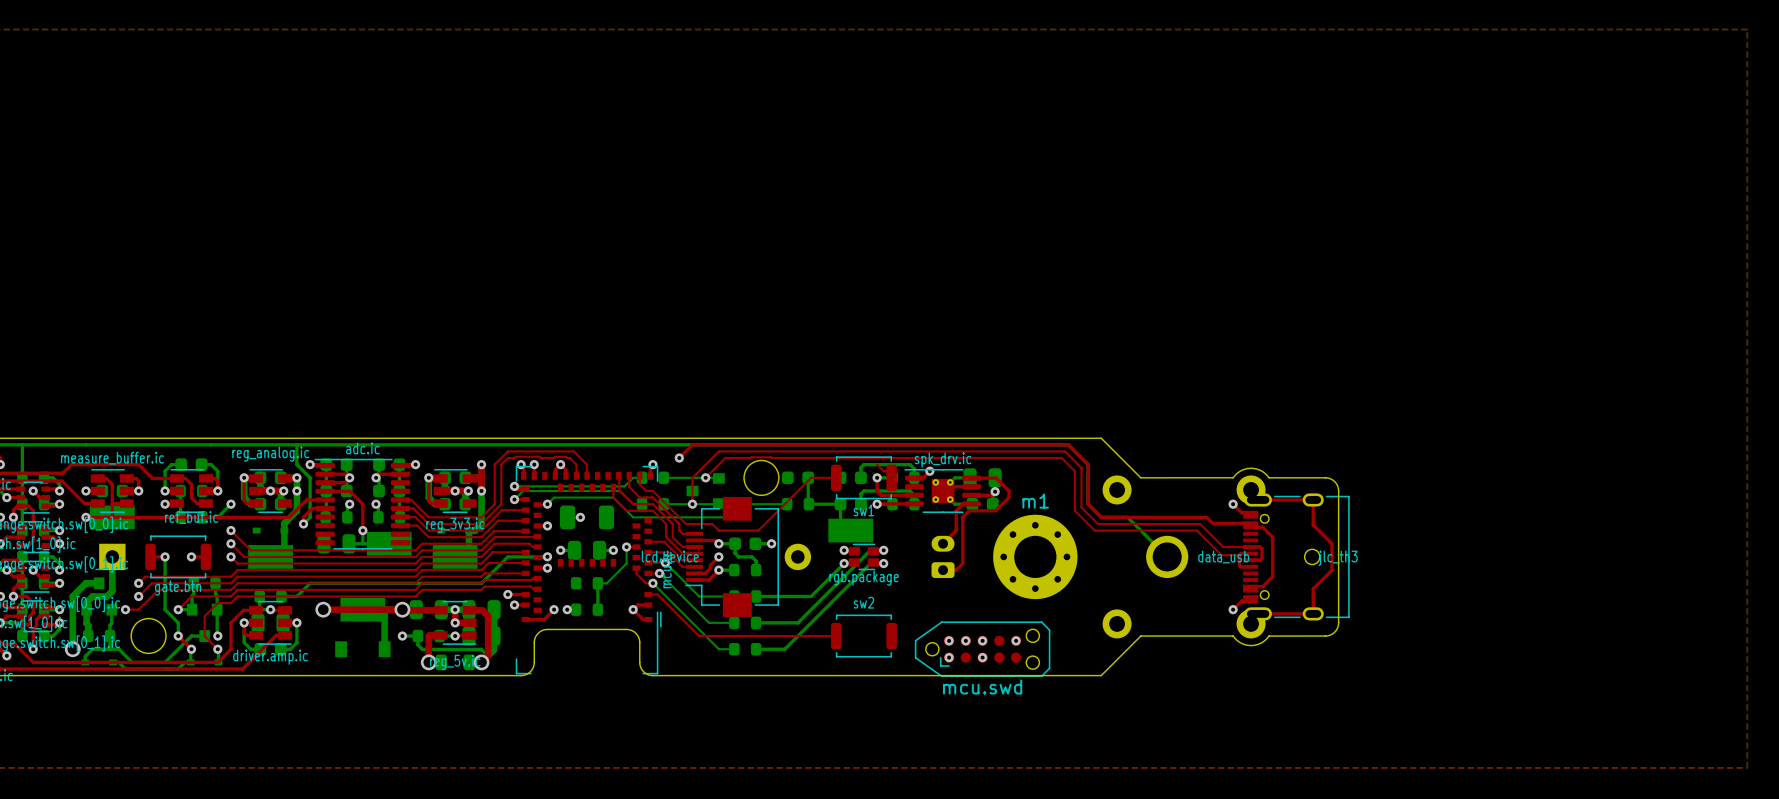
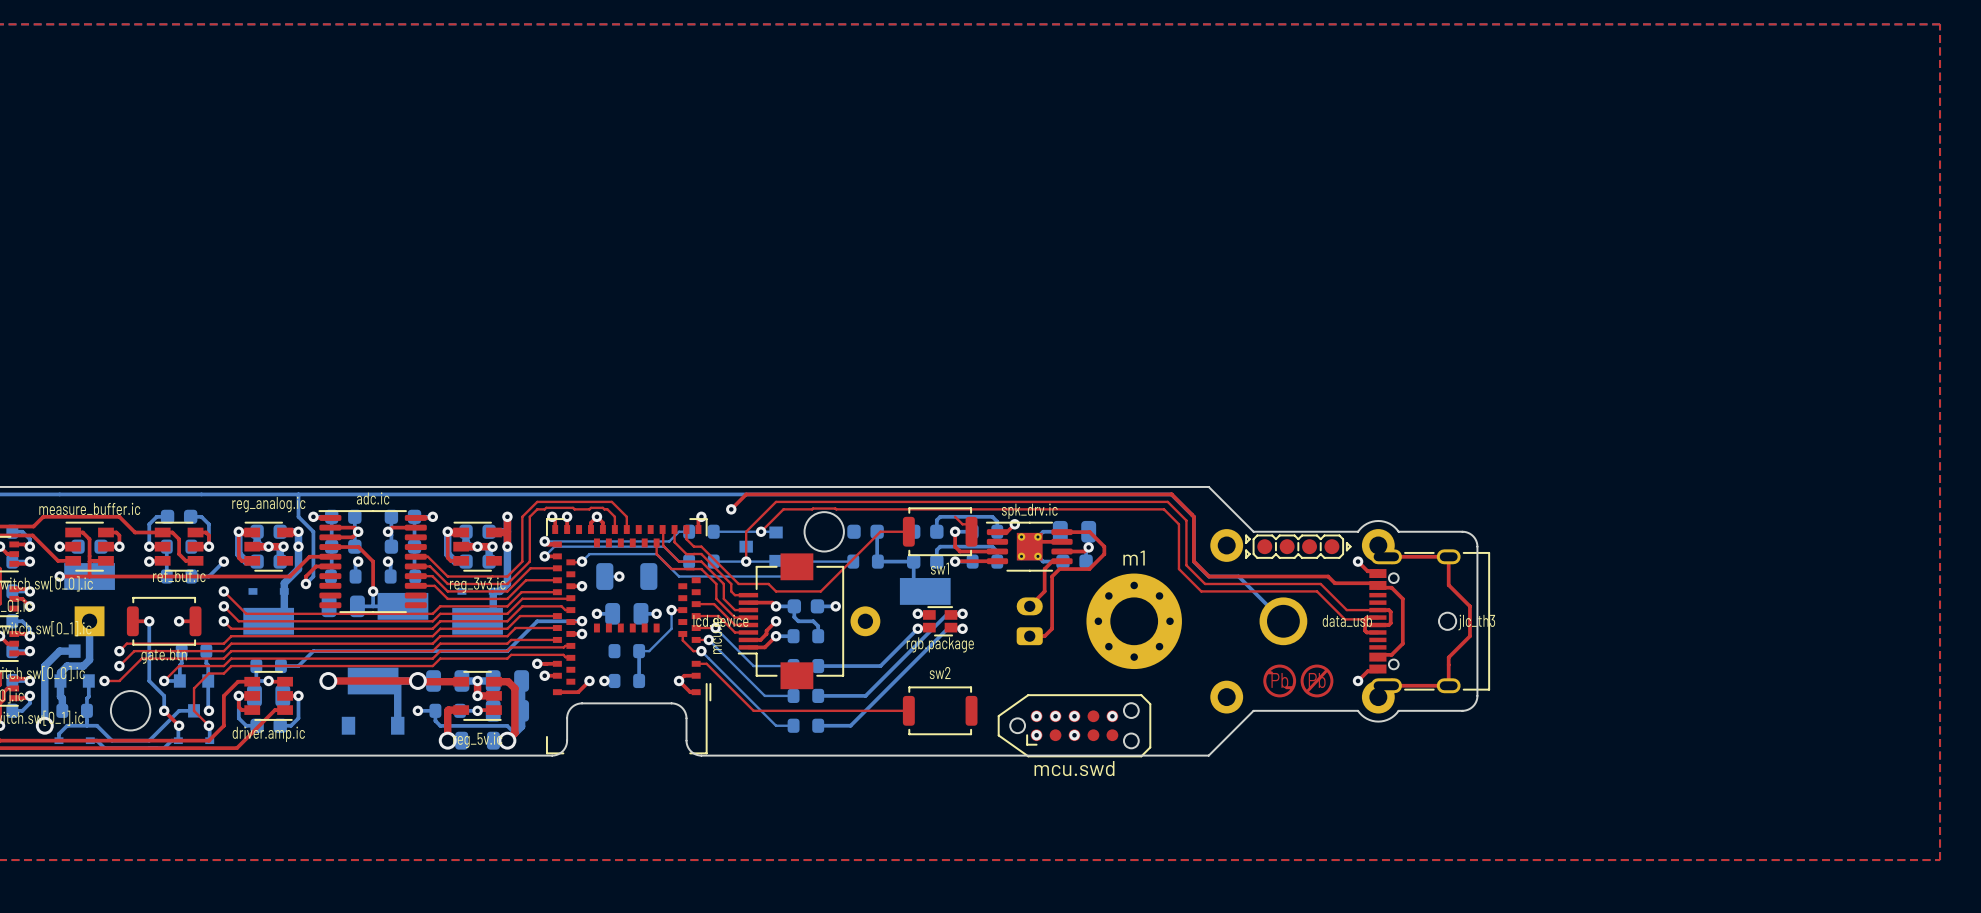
drawing: none -> [1245, 534, 1352, 559]
drawing: none -> [1263, 664, 1334, 698]

